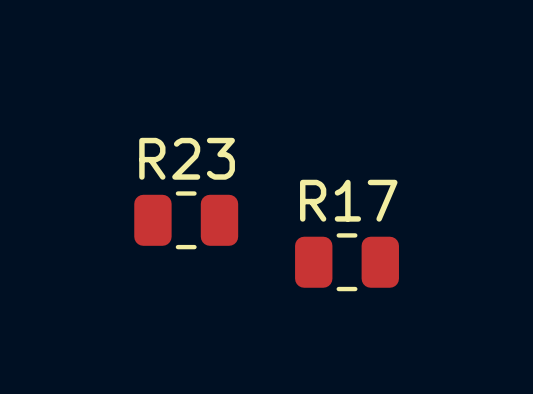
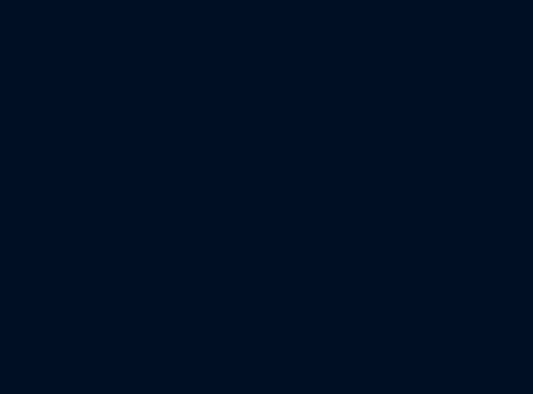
R23: (186, 220) -> none
R17: (347, 262) -> none

